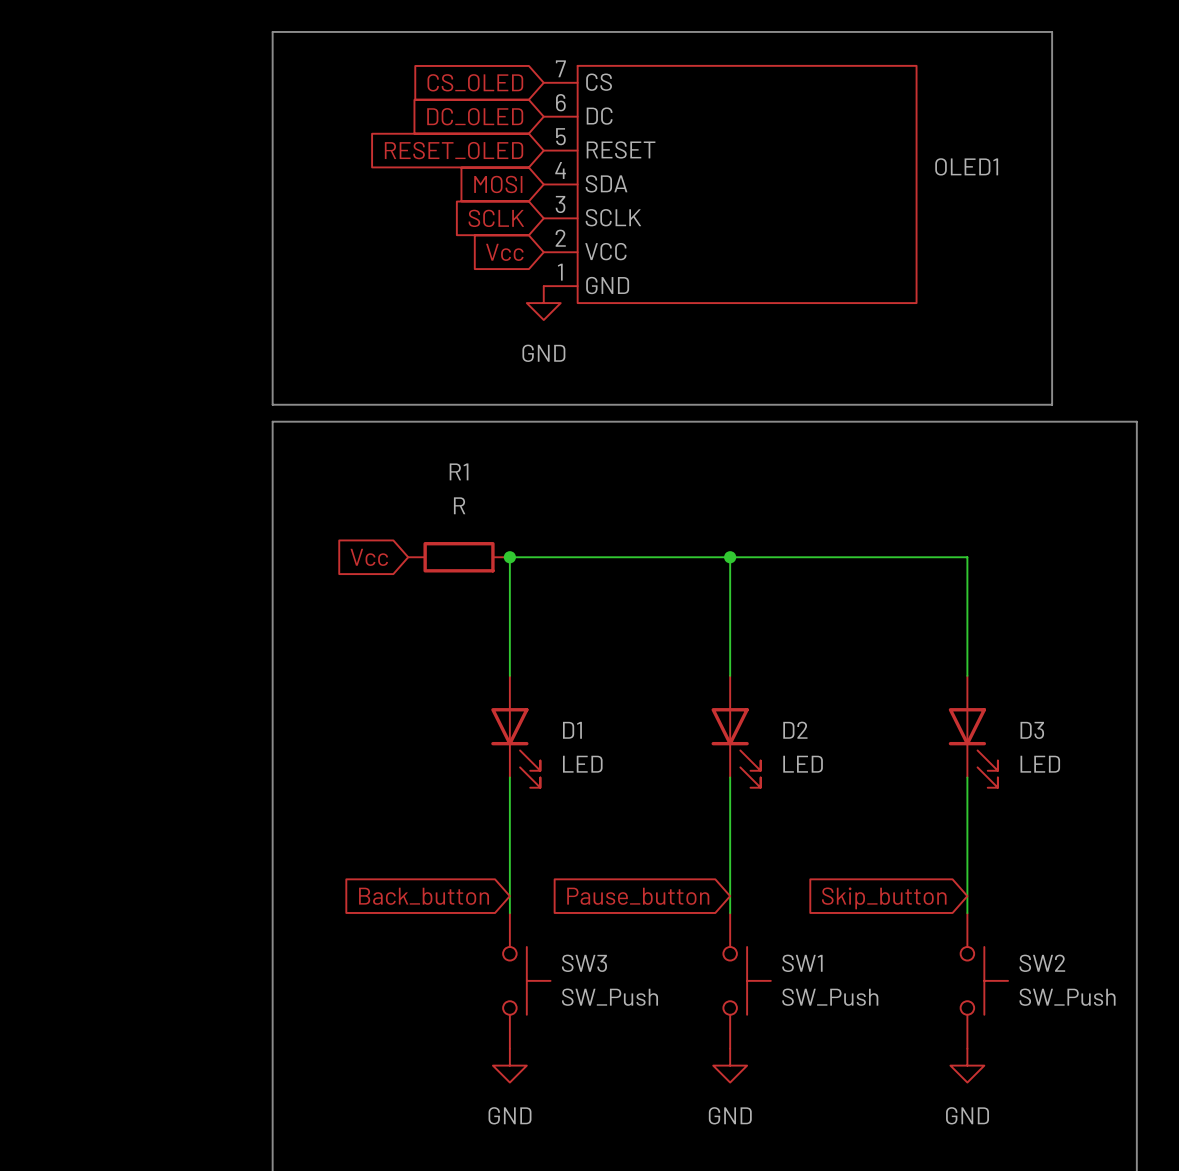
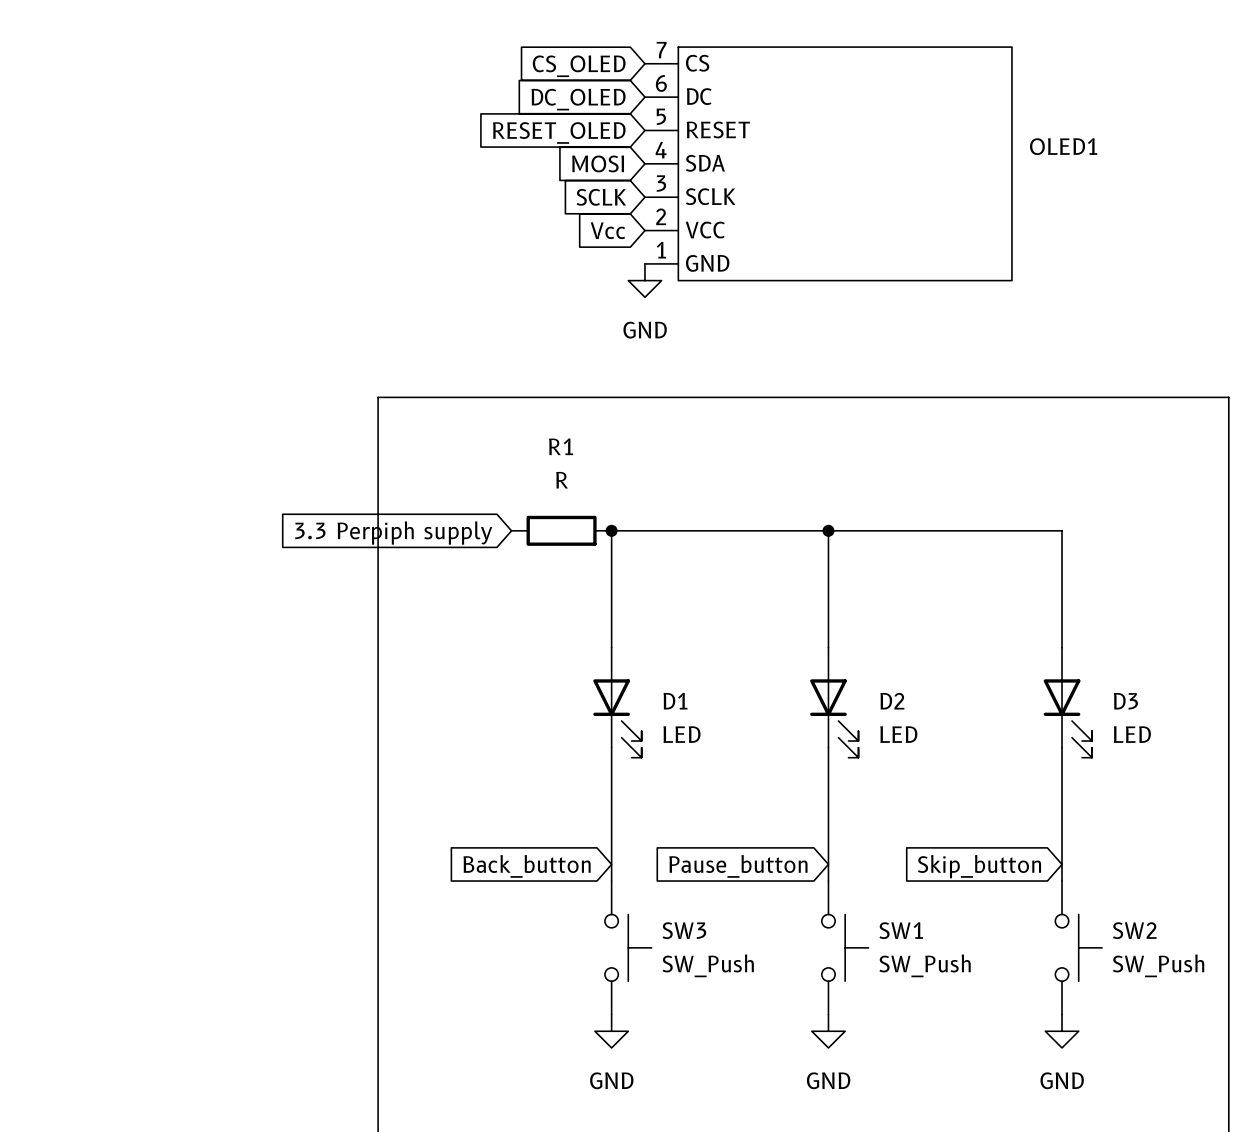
line: (272, 31) (272, 404) (1052, 404) (1052, 31) (272, 31) -> none
global label: Vcc (369, 557) -> 3.3 Perpiph supply (393, 533)

